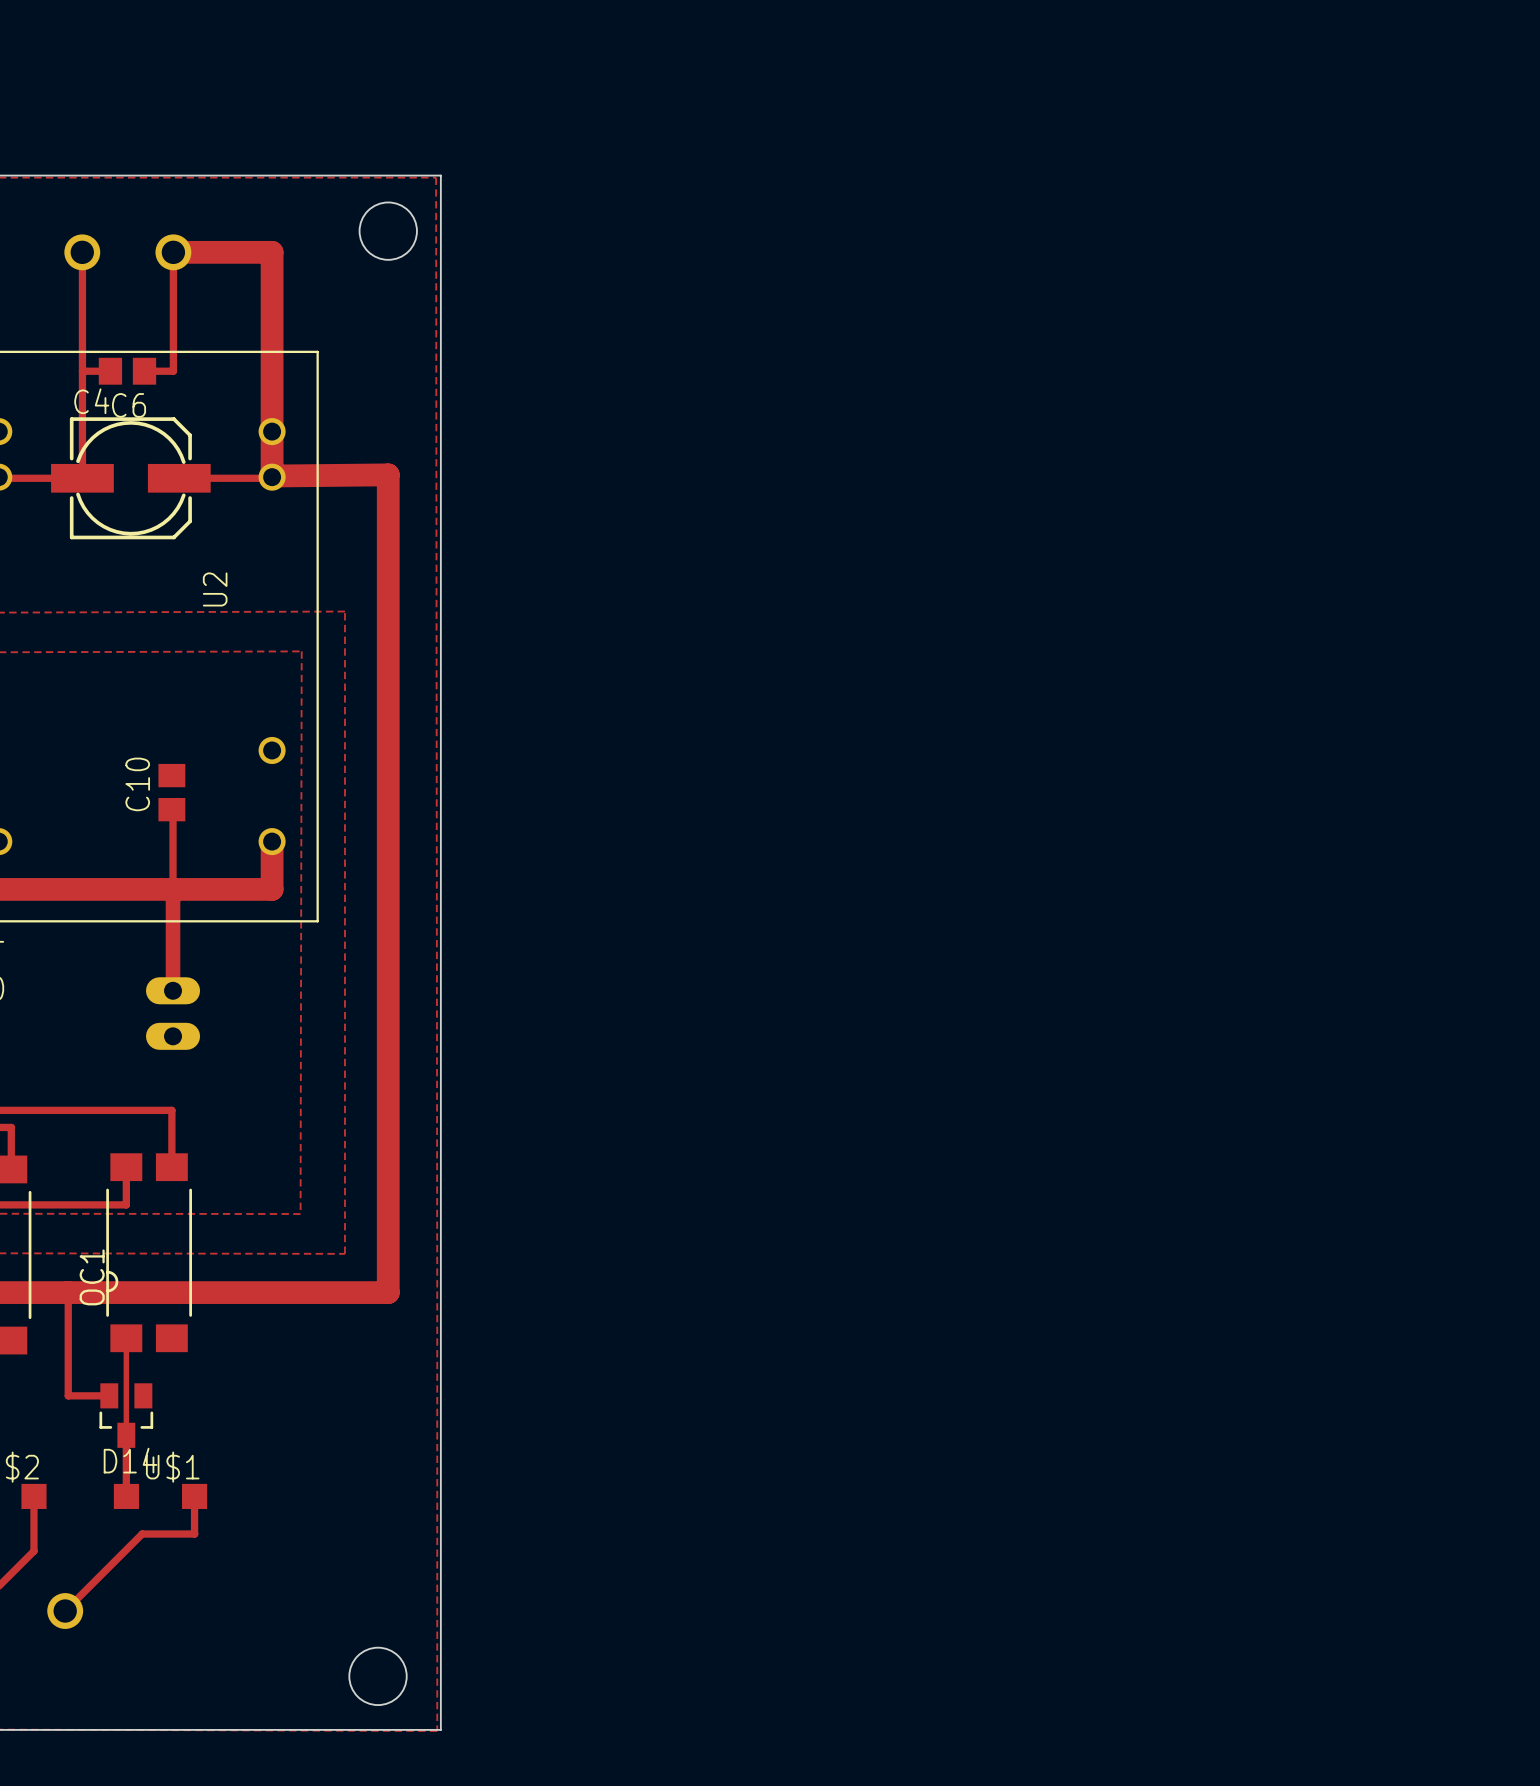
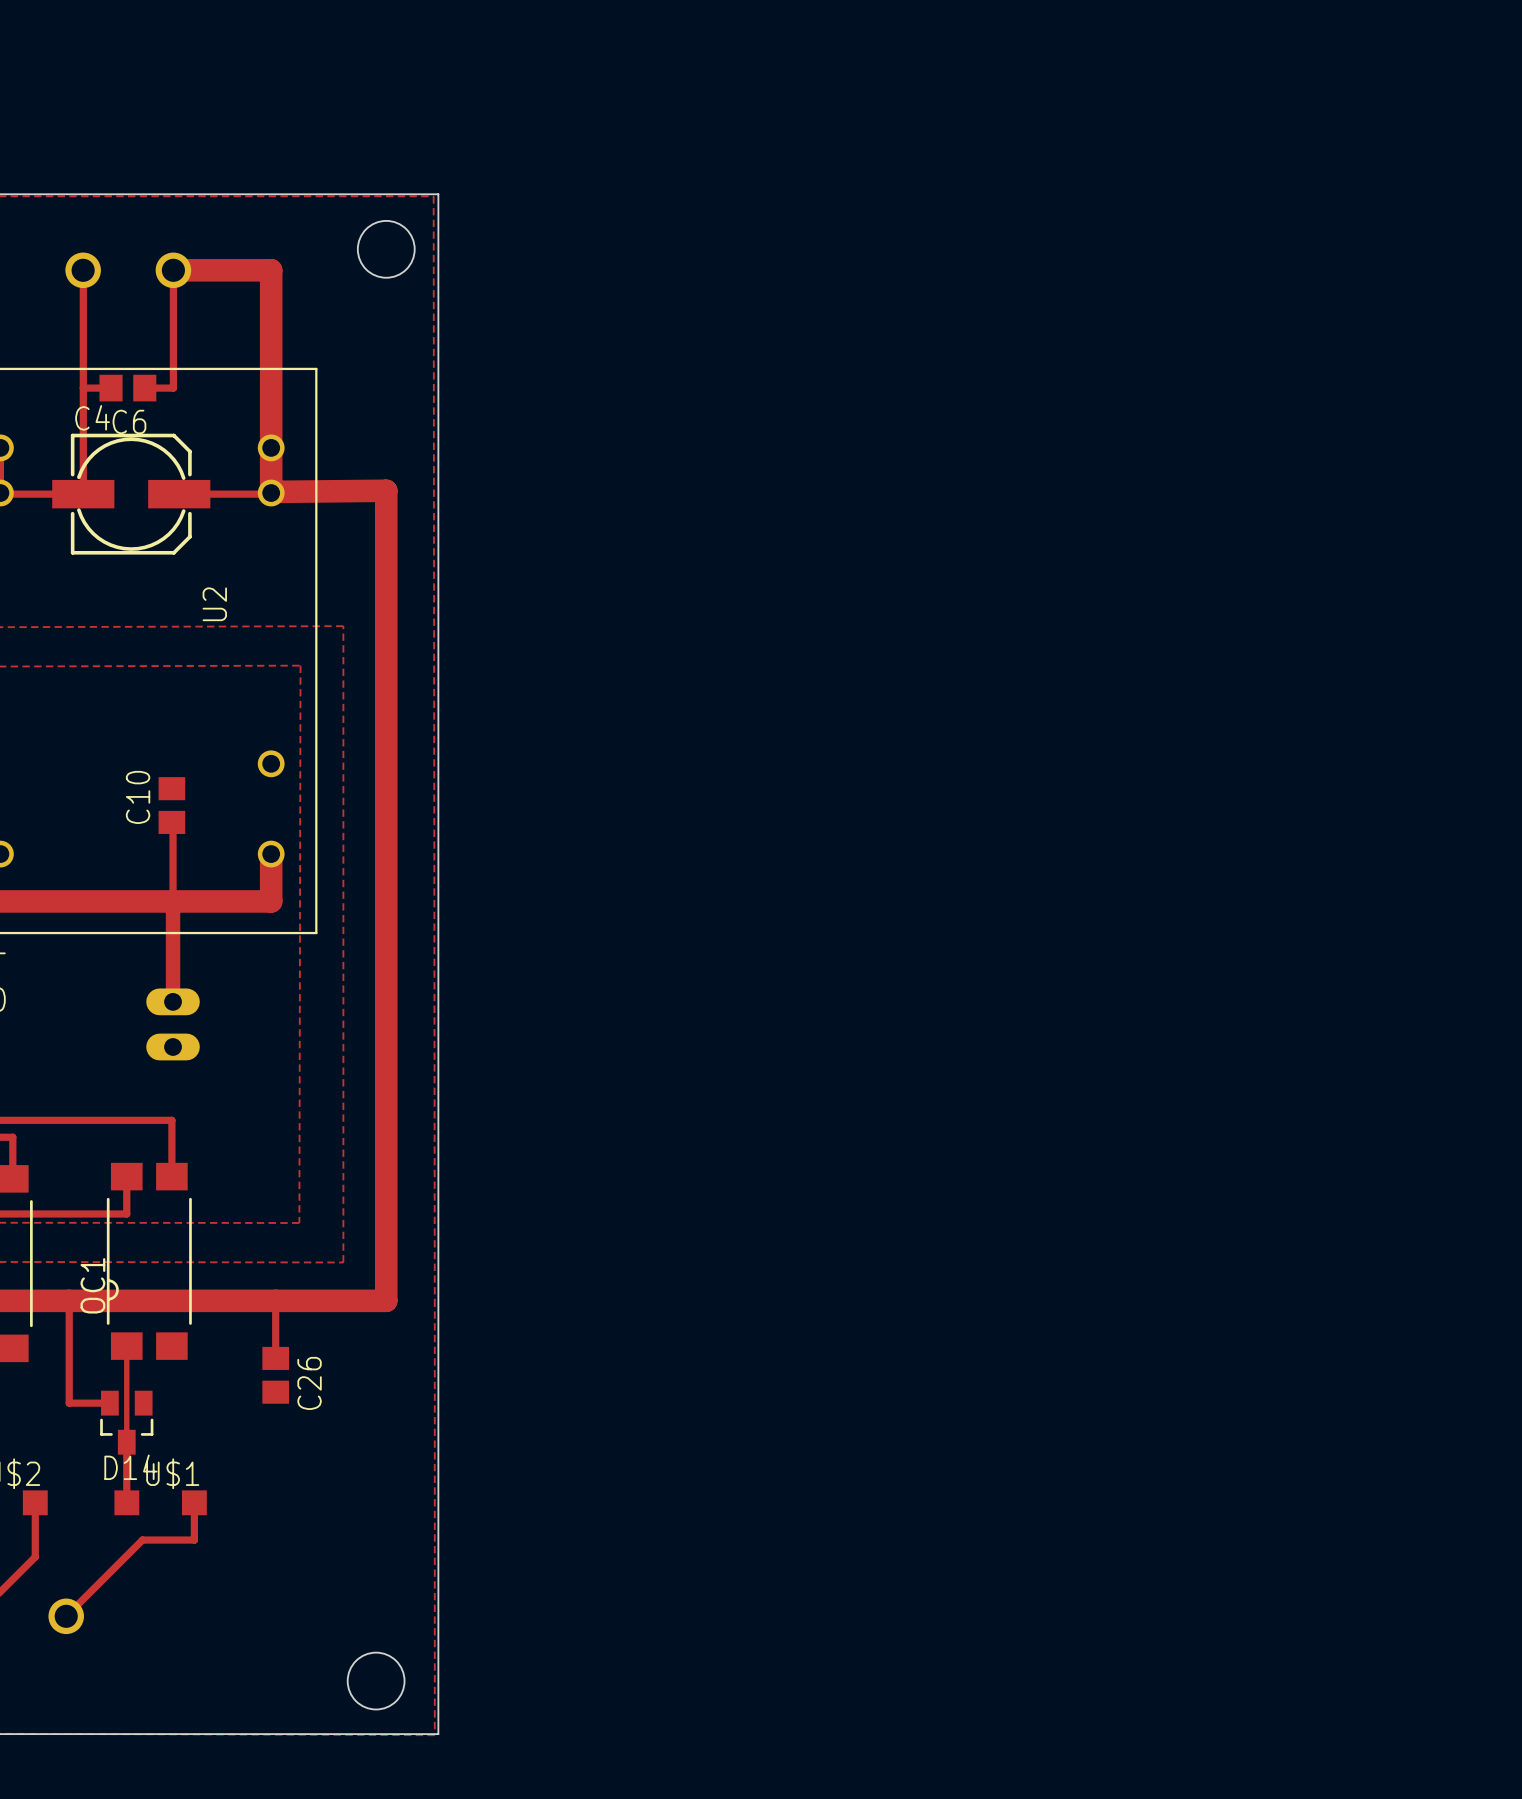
track: none -> (275, 1300) (275, 1358)
C26: none -> (275, 1375)

